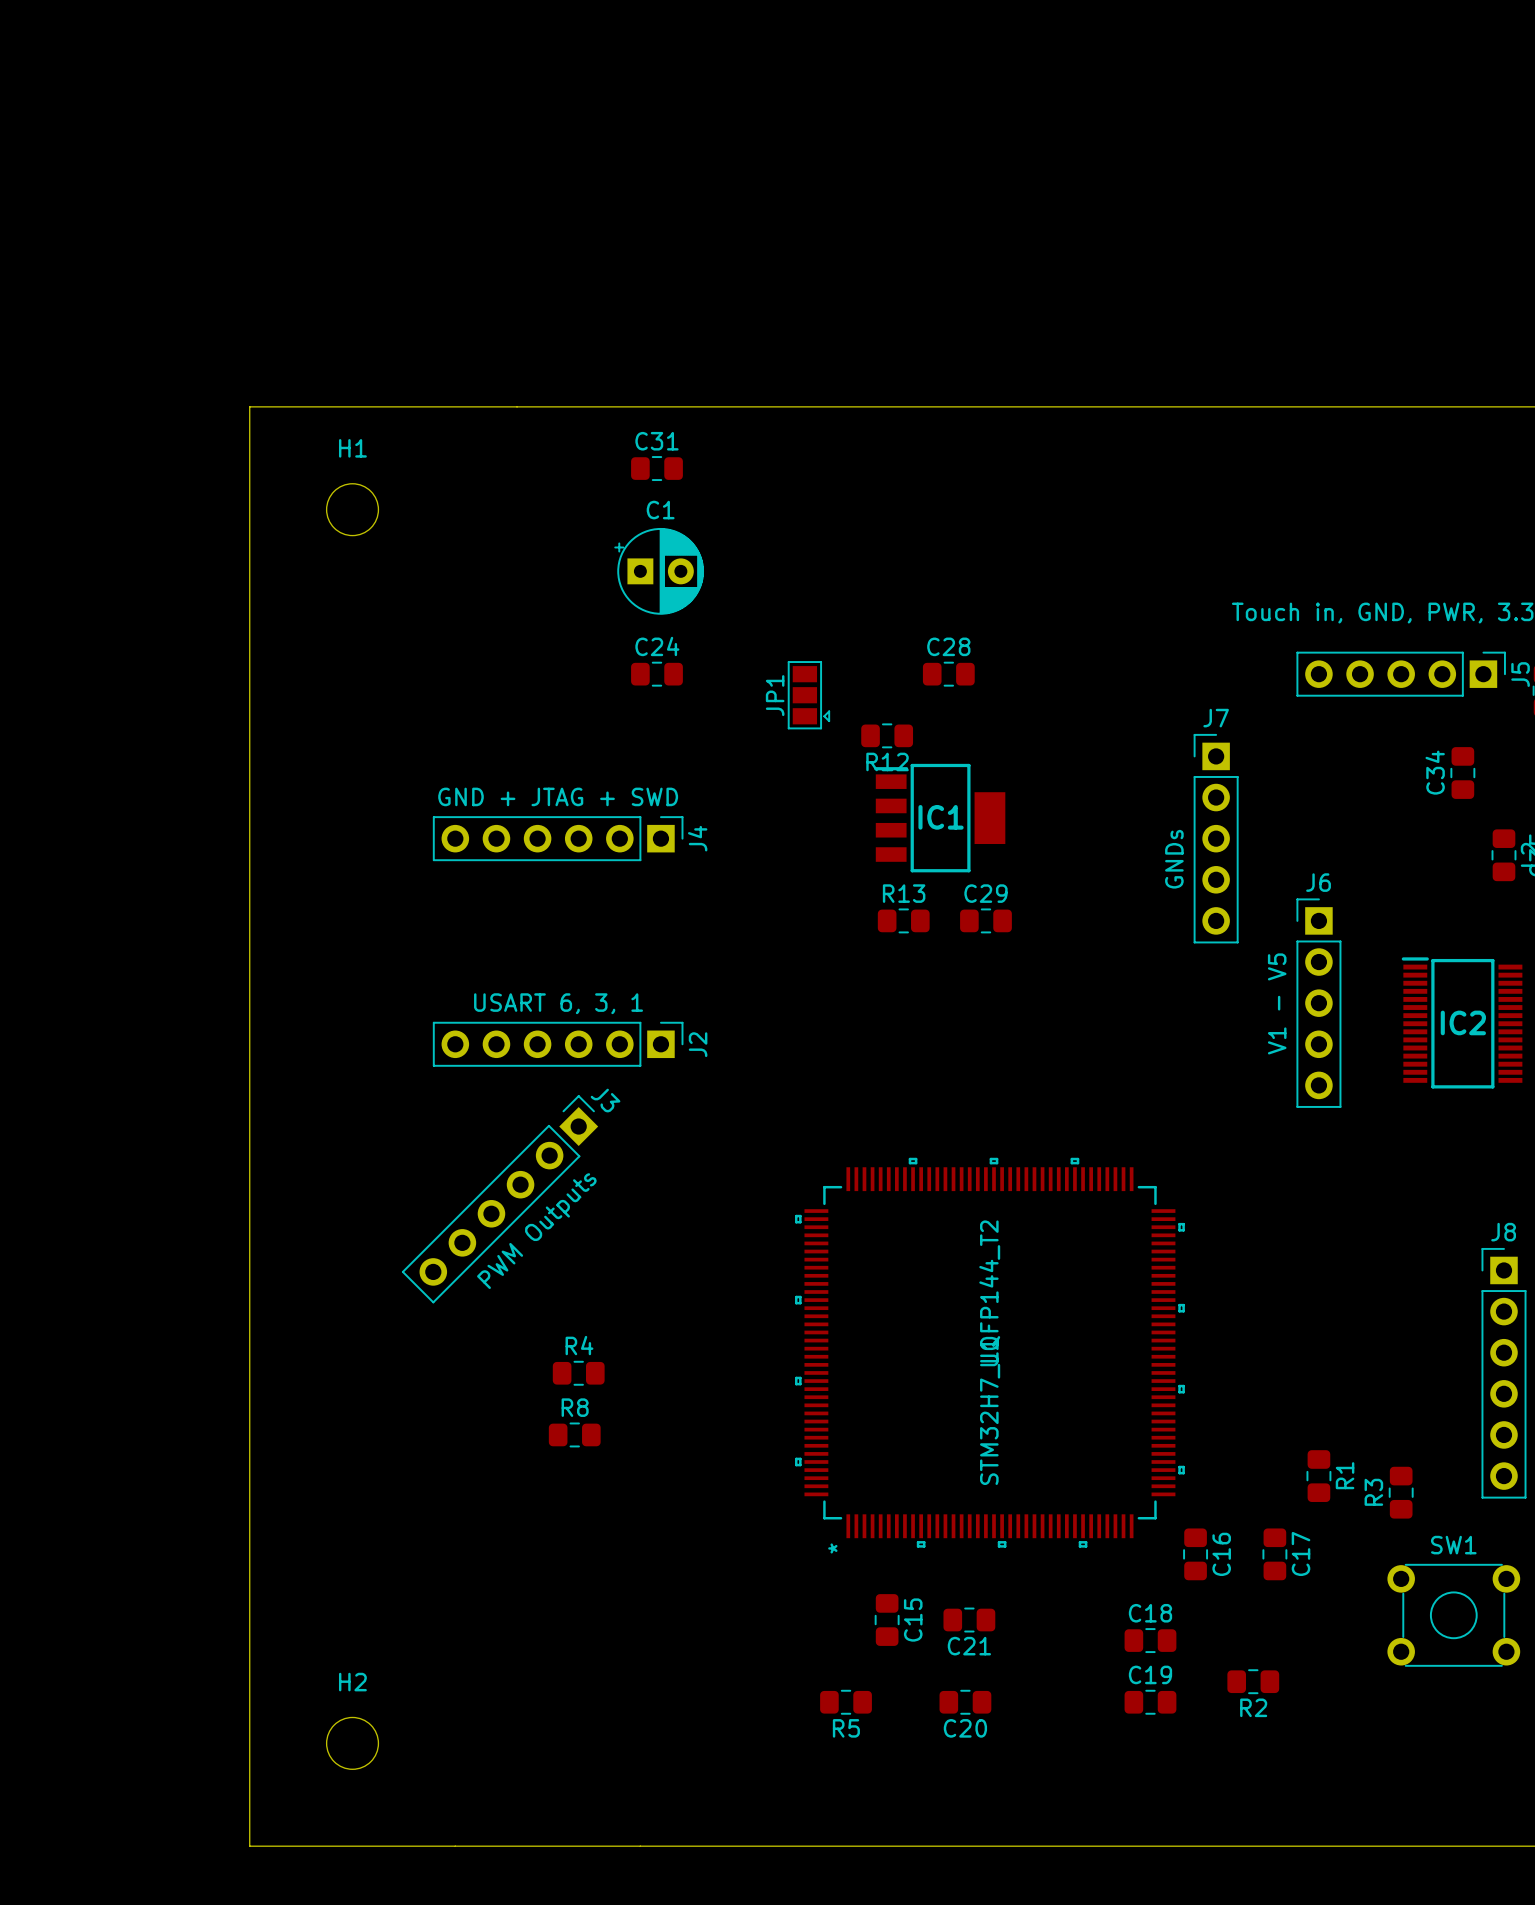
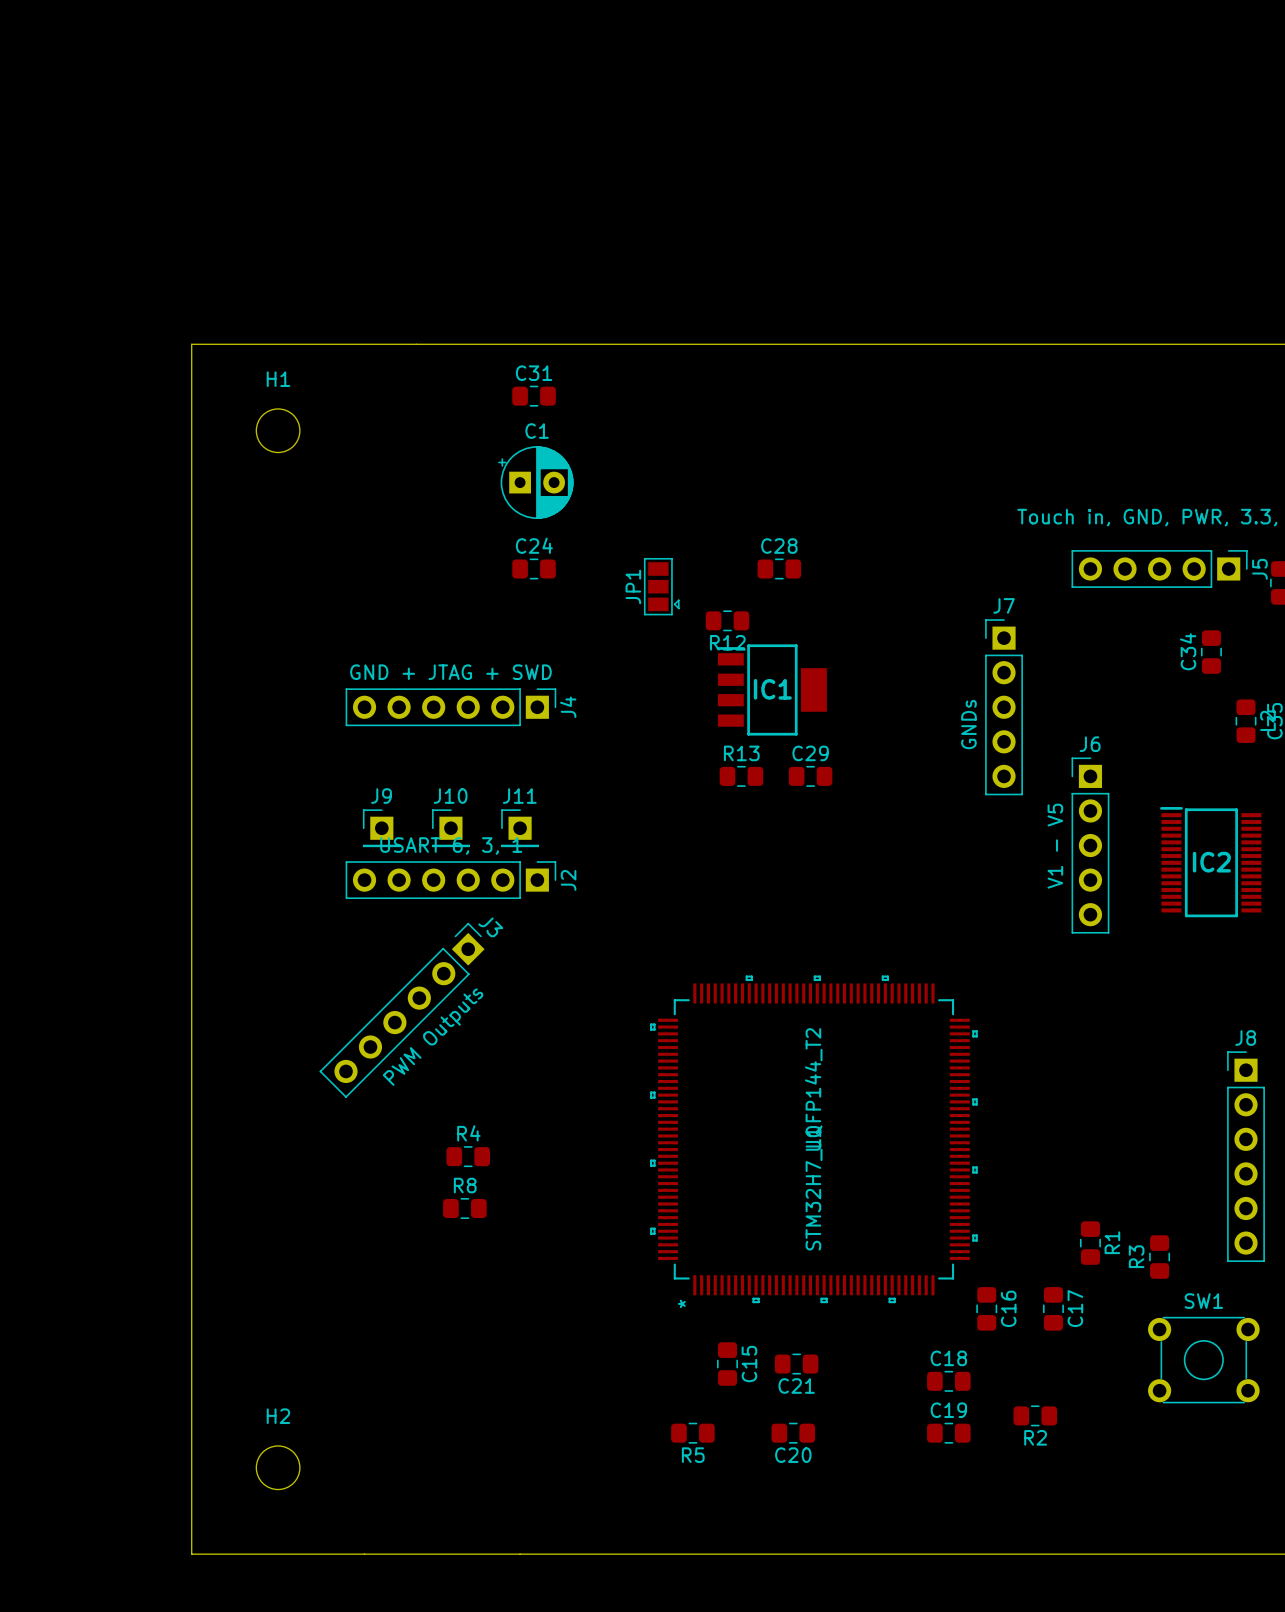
J9: none -> (381, 828)
J10: none -> (450, 828)
J11: none -> (520, 828)

